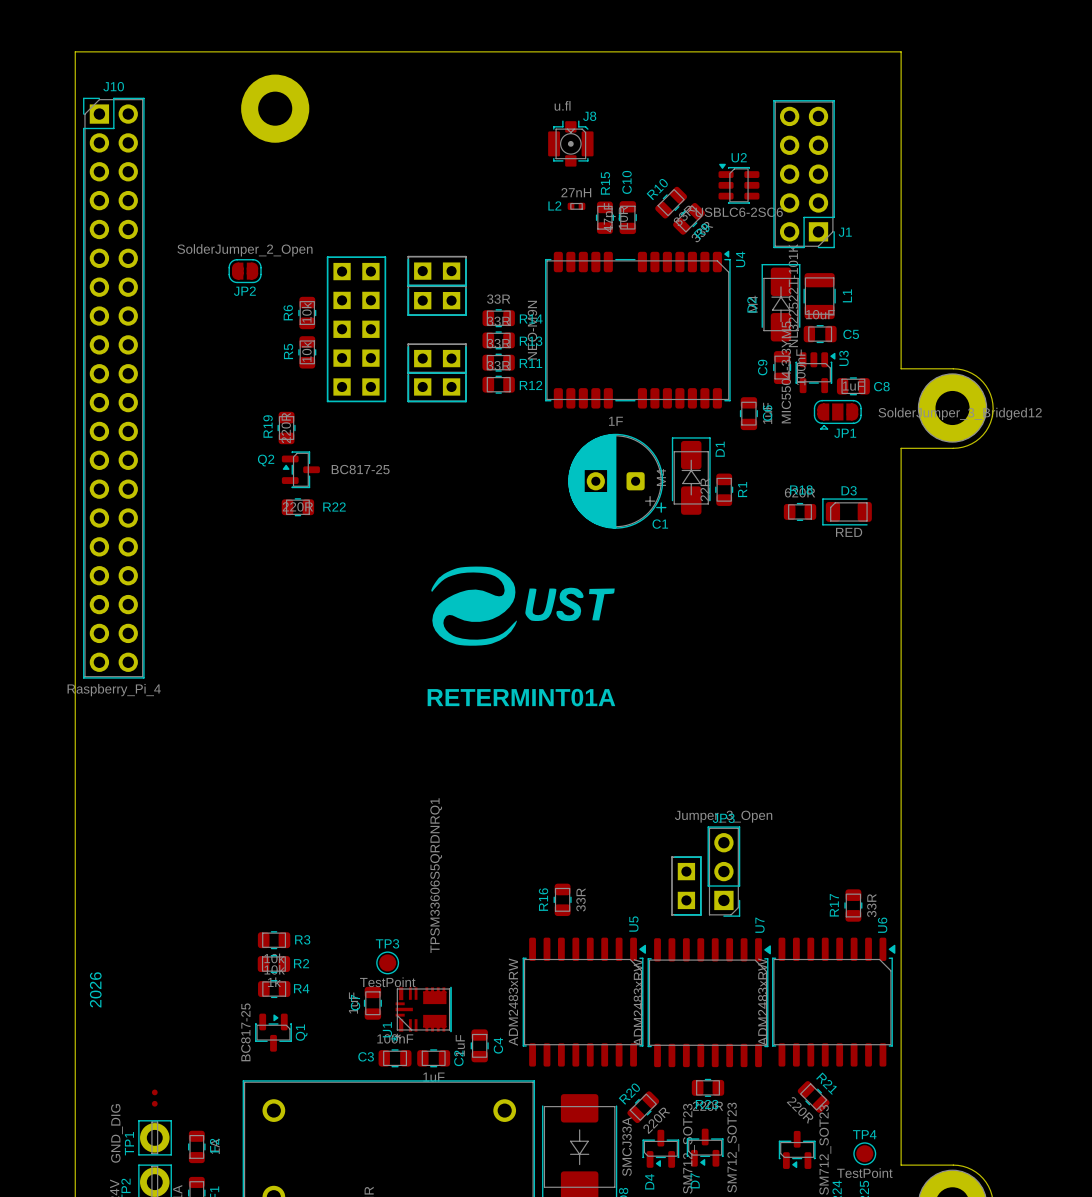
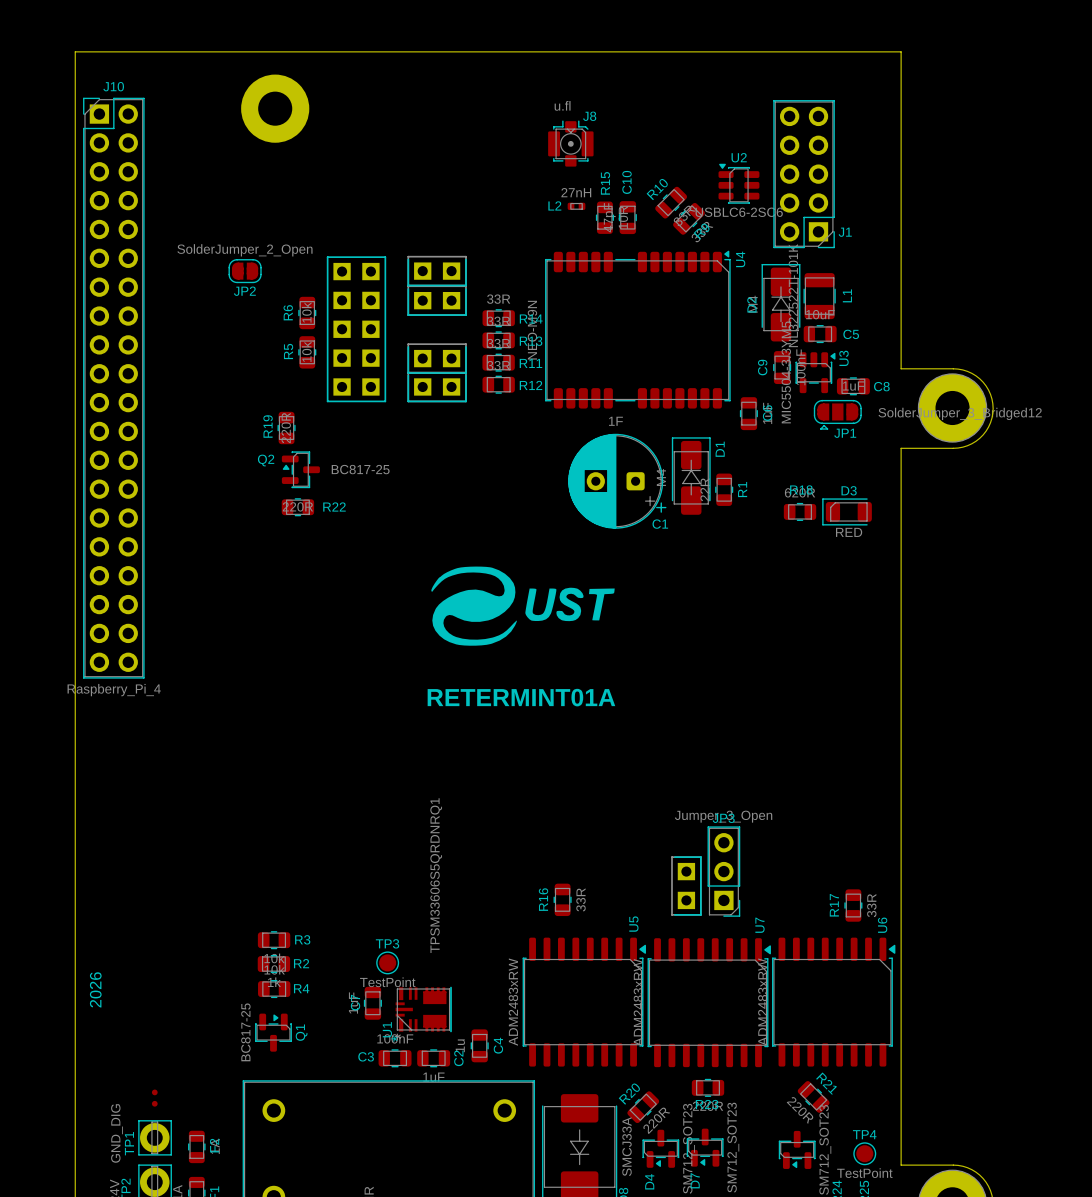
C4 value: 1uF (460, 1045) -> 1u (460, 1045)

